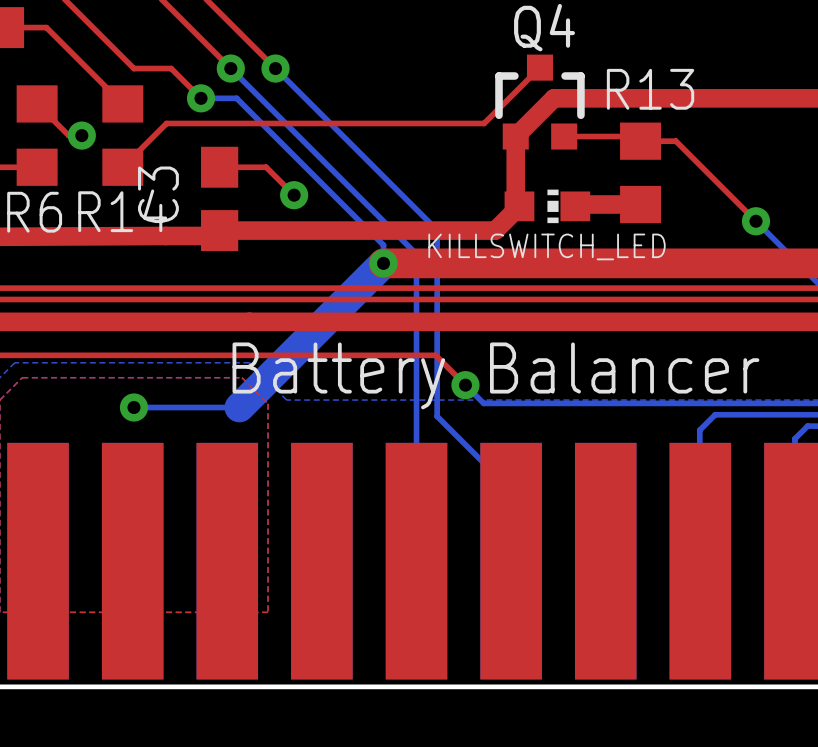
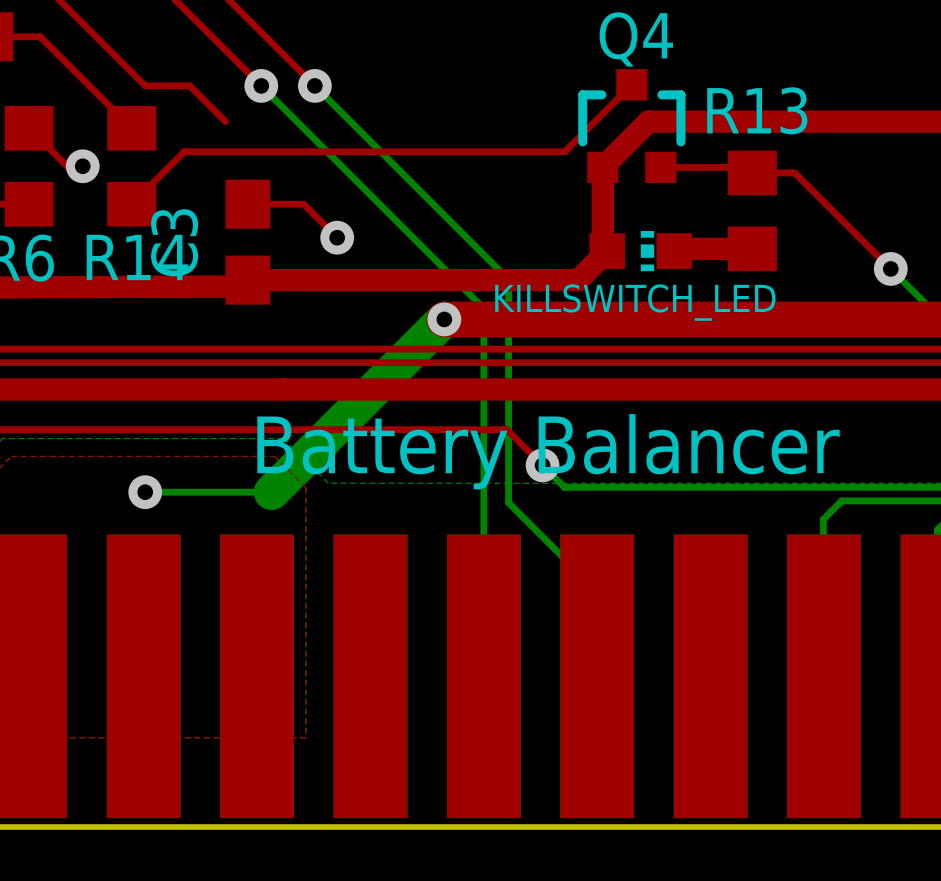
bottom track: (201, 98) (236, 98) (383, 245) (383, 263) -> none
via: (201, 98) -> none

